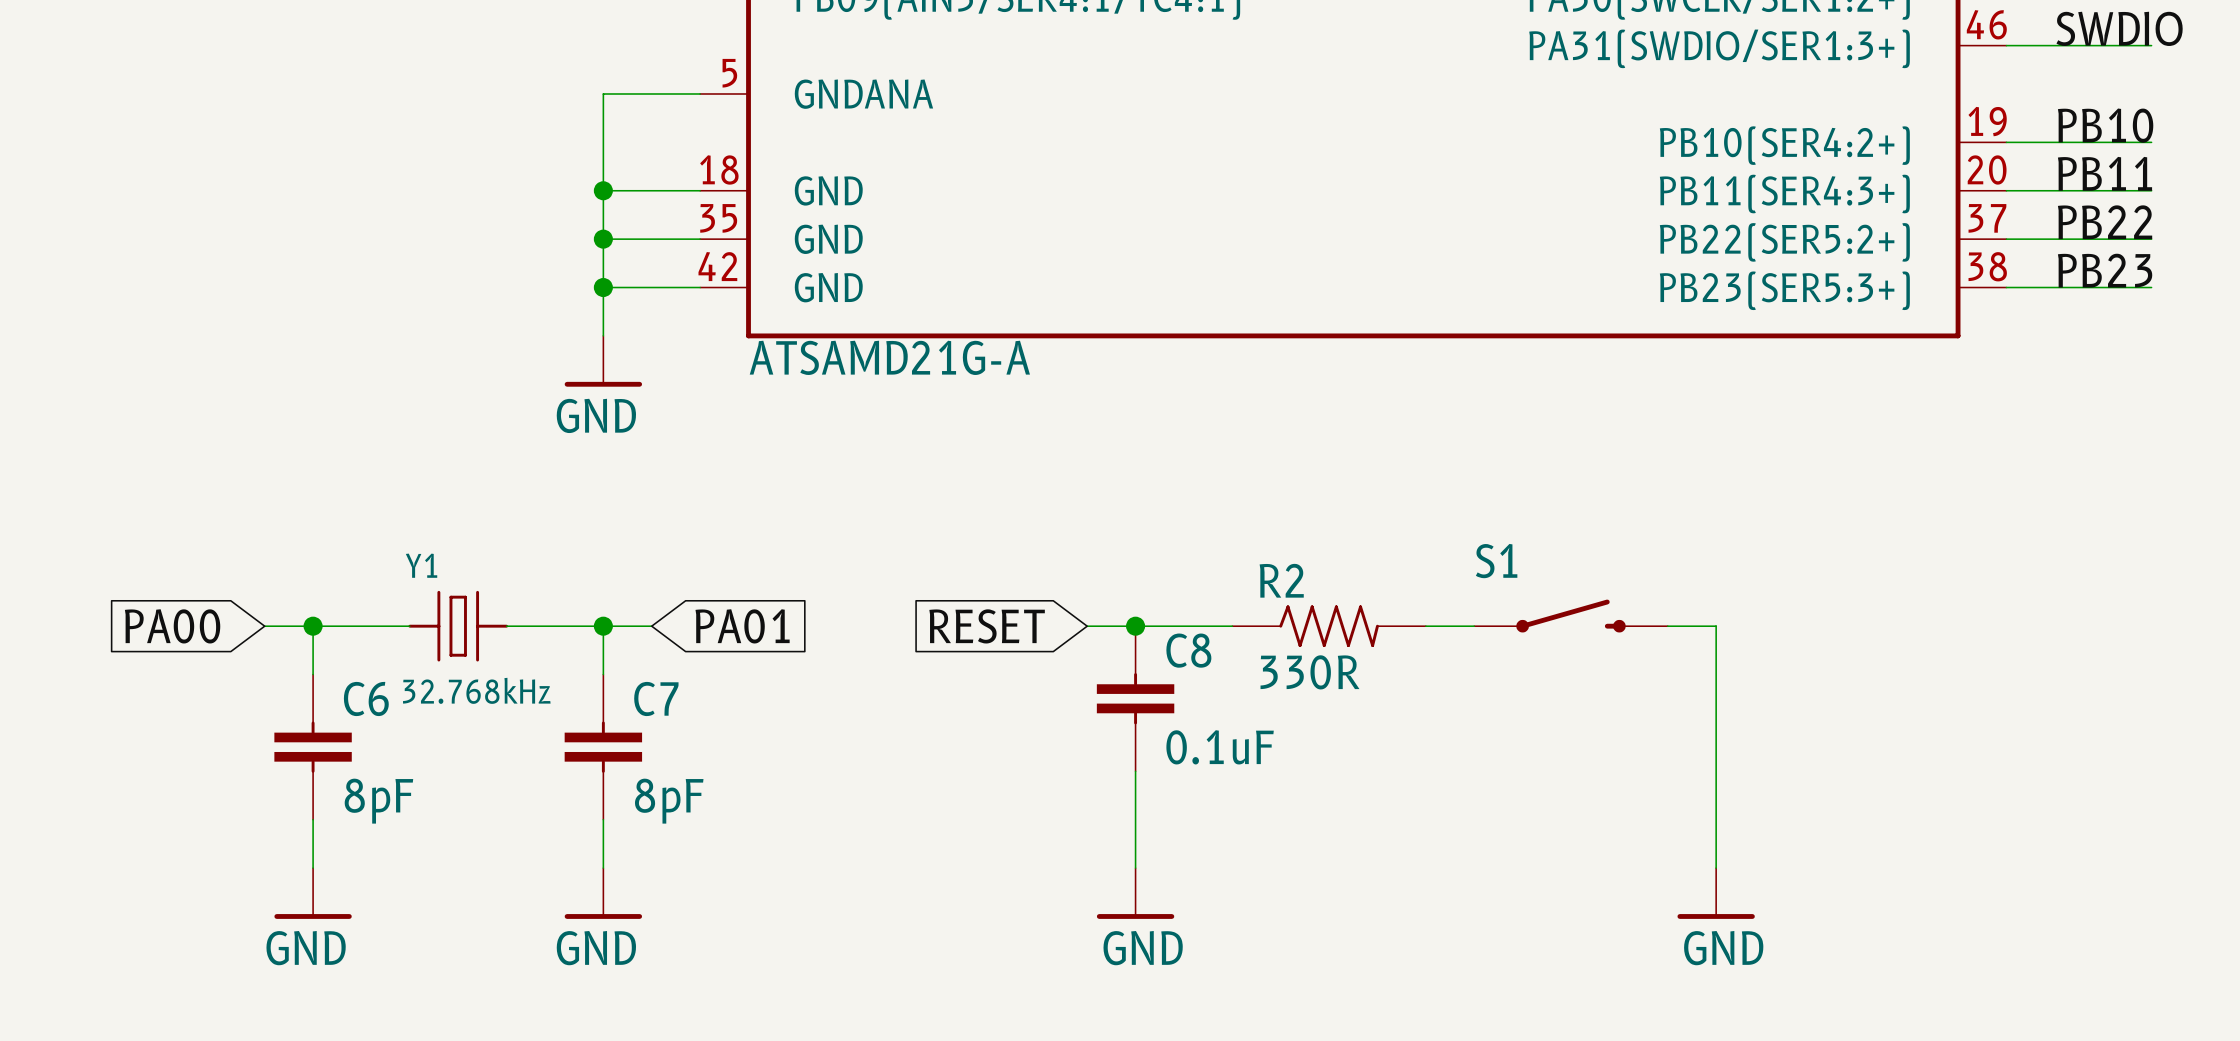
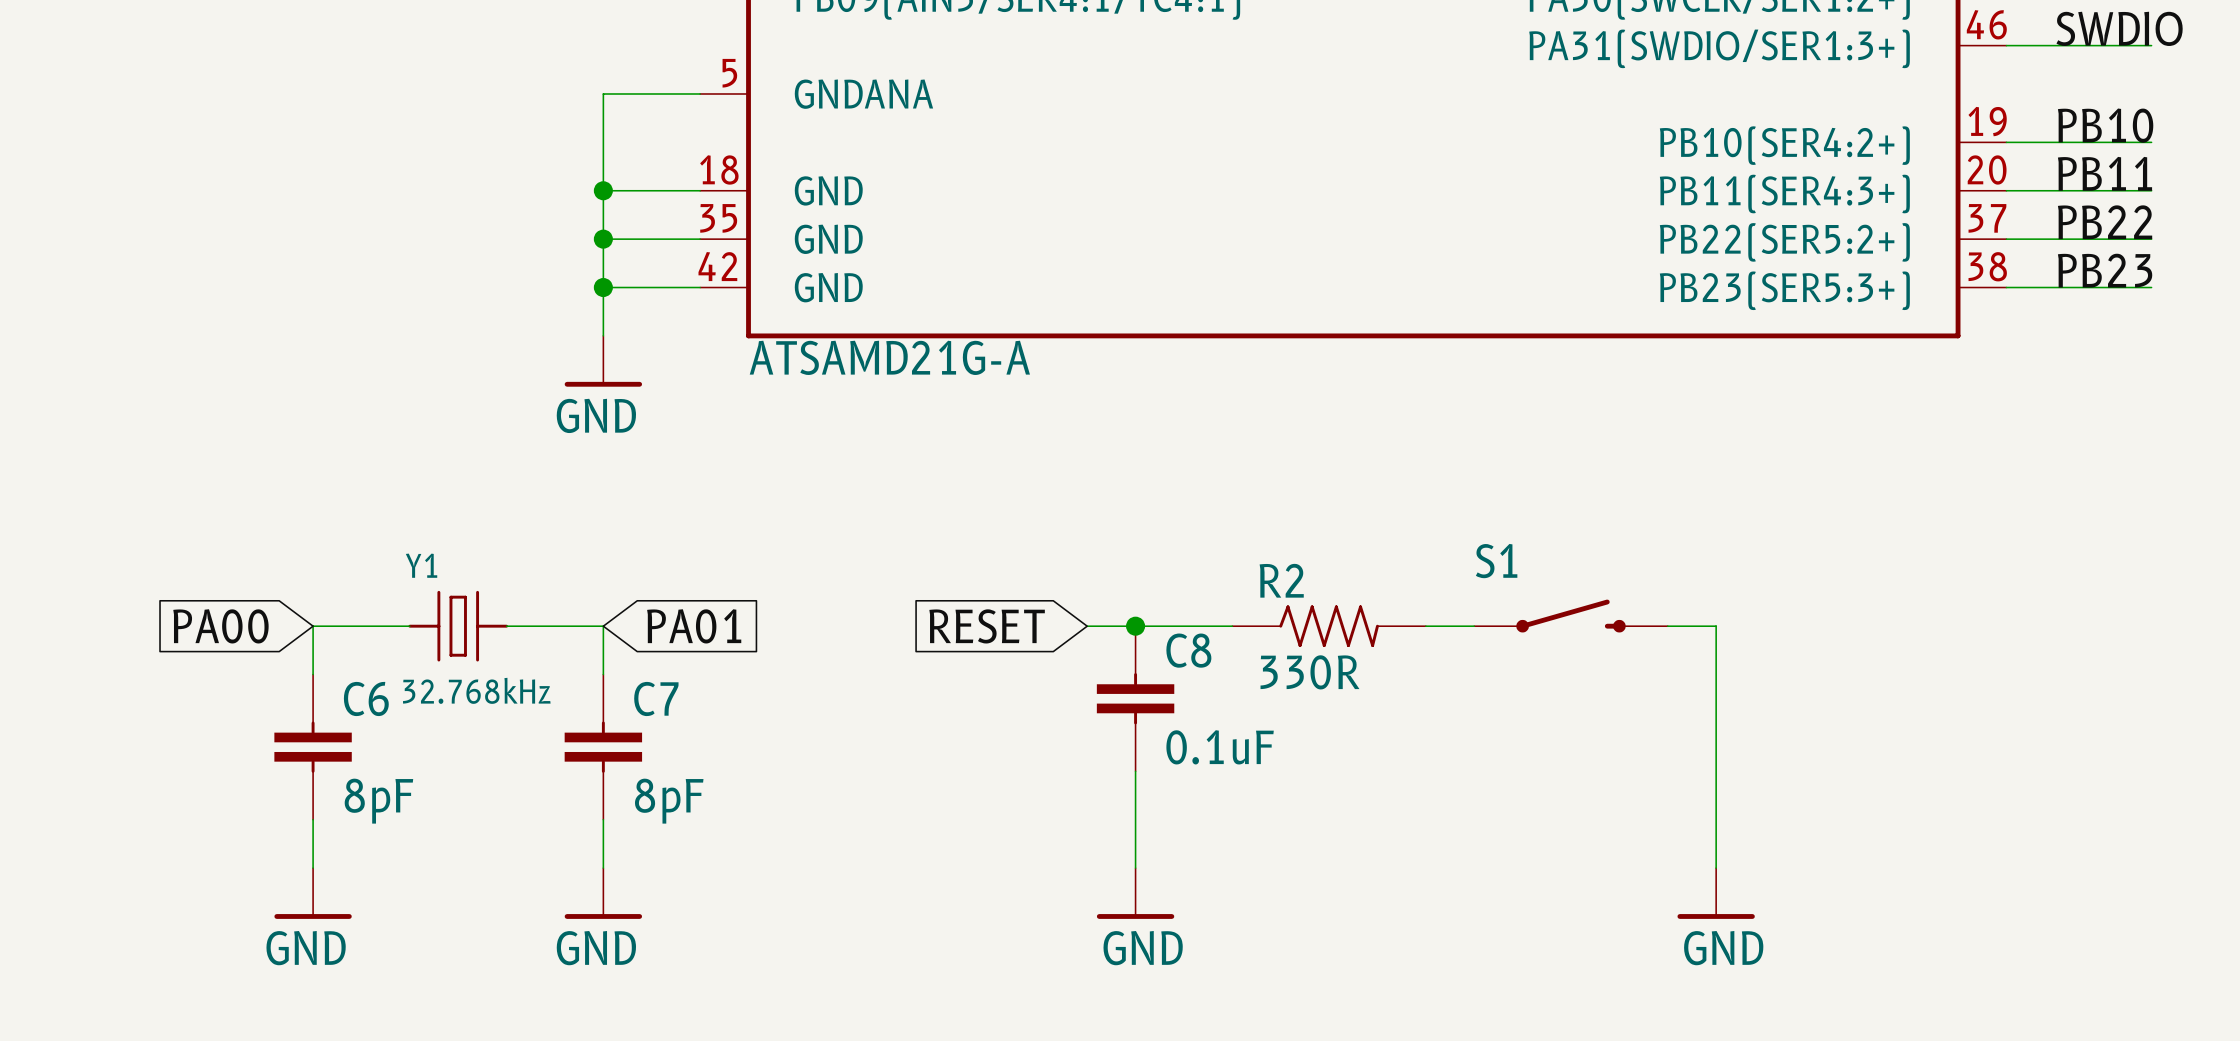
global label position: PA00 (172, 626) -> PA00 (220, 626)
wire: (264, 626) (313, 626) -> none
junction: (313, 626) -> none
wire: (603, 626) (651, 626) -> none
junction: (603, 626) -> none
global label position: PA01 (742, 626) -> PA01 (694, 626)

